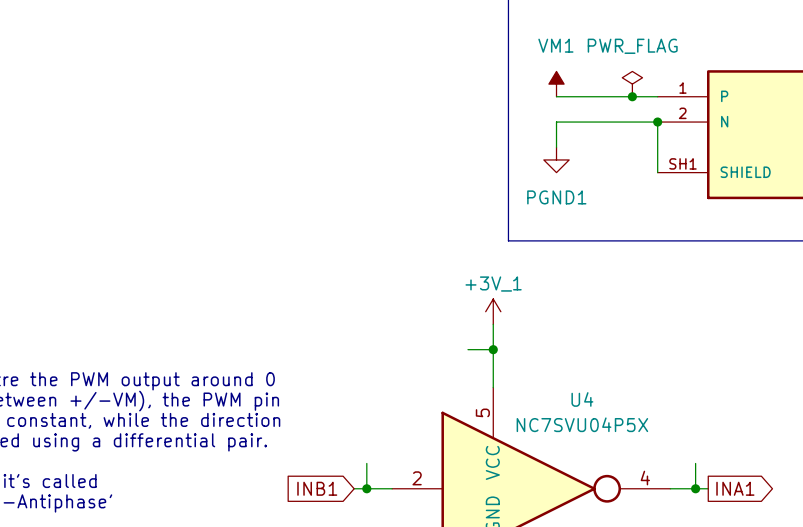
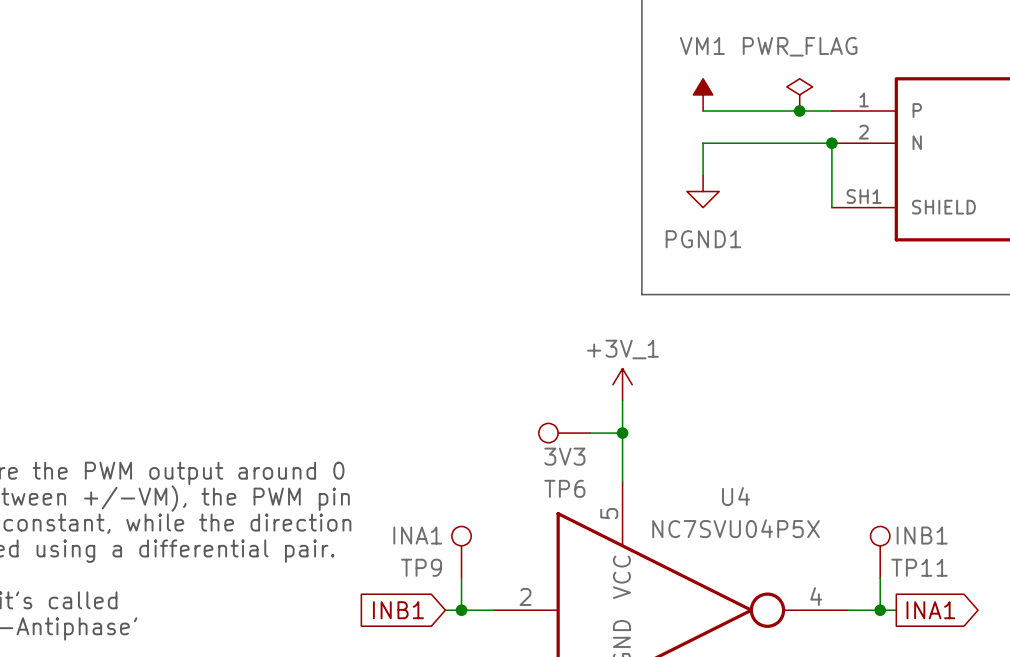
TP6: none -> 3V3 (564, 433)
TP9: none -> INA1 (461, 552)
TP11: none -> INB1 (880, 552)

